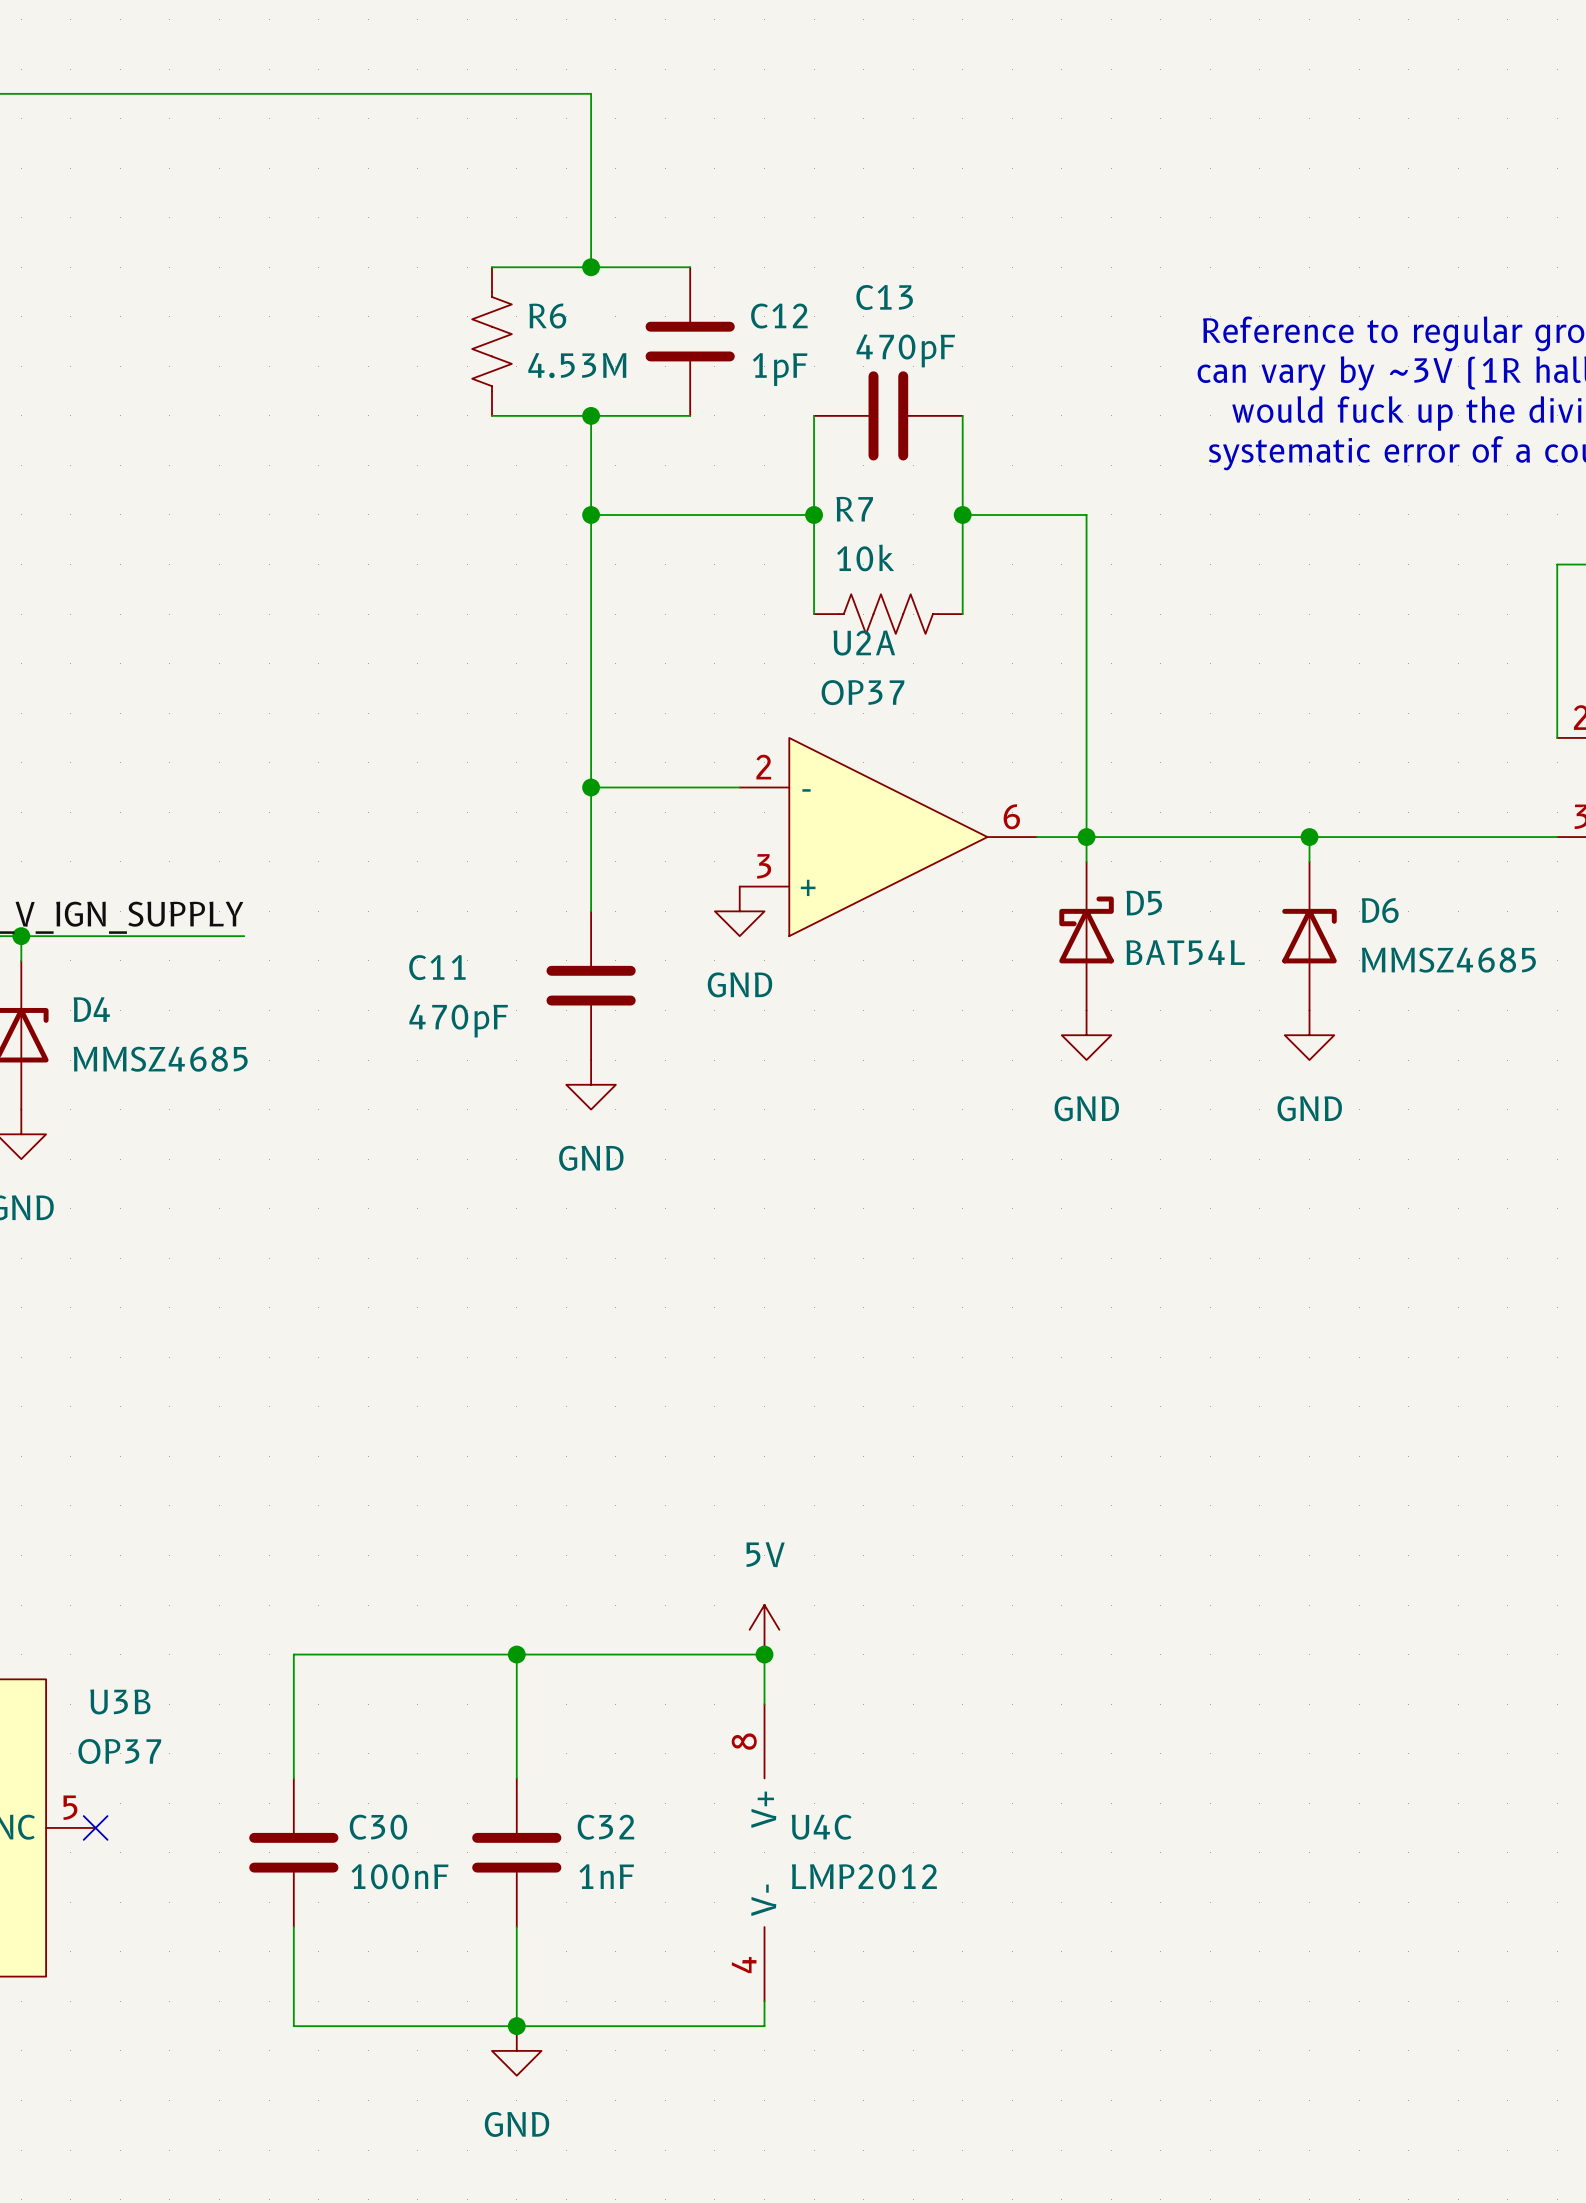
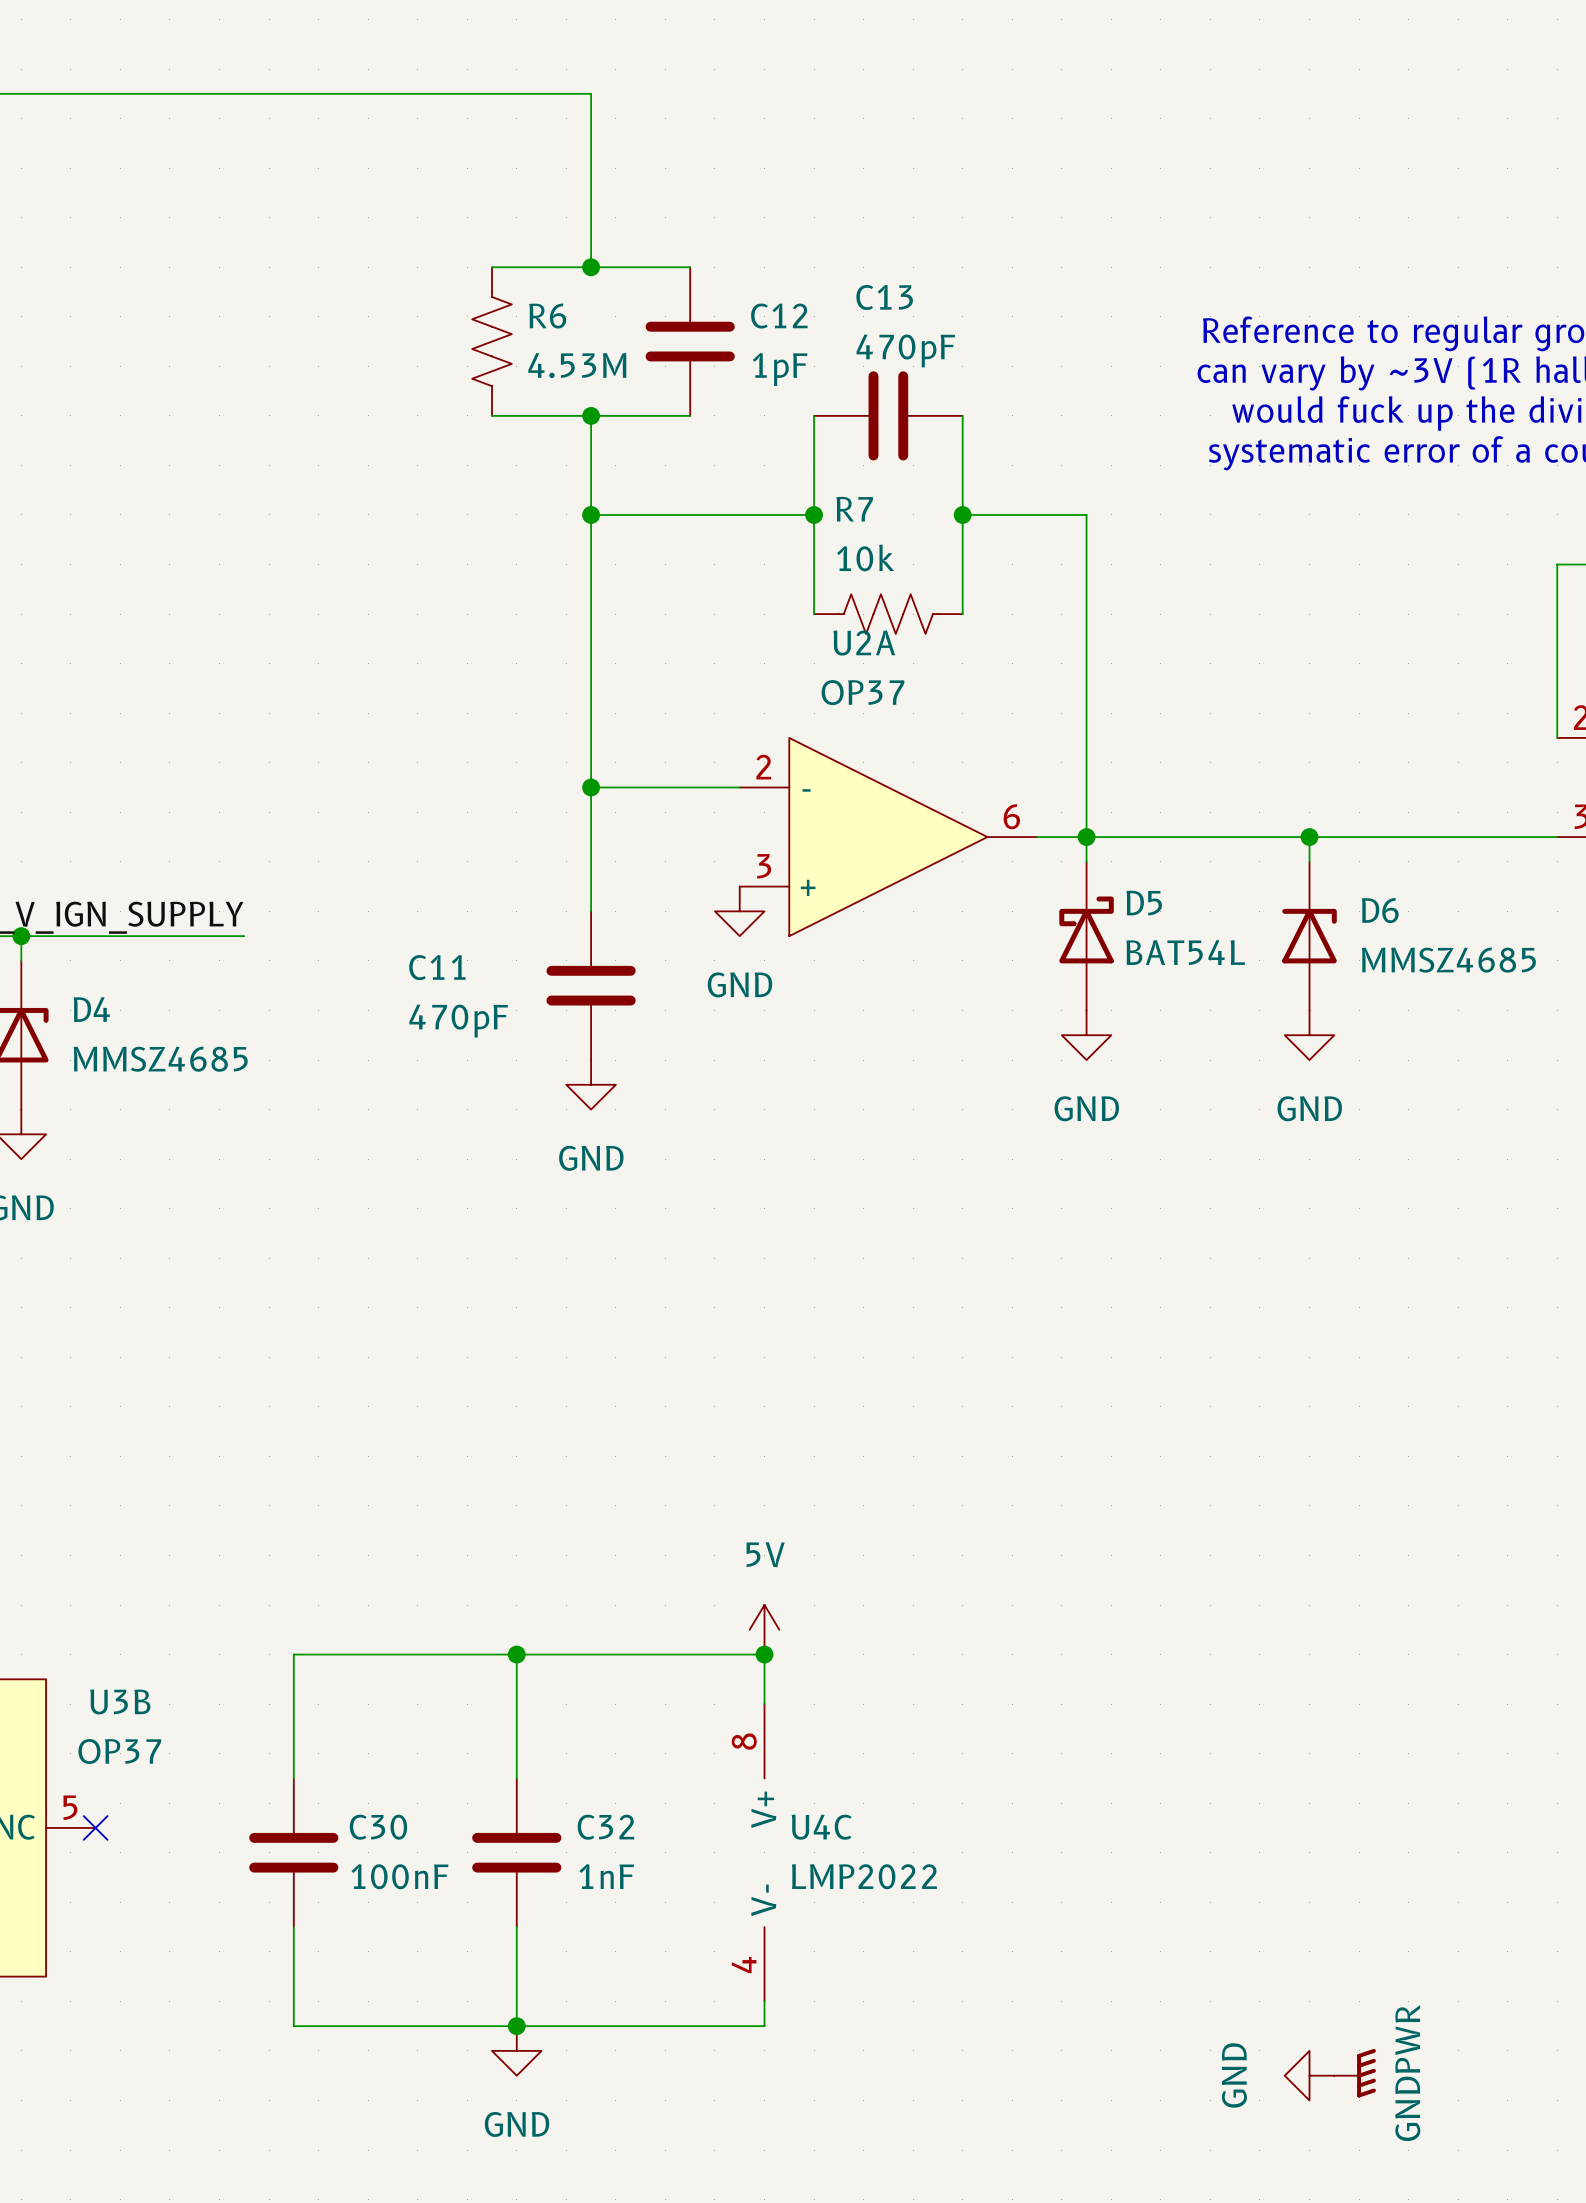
U4C value: LMP2012 (864, 1876) -> LMP2022 (864, 1876)
power symbol: none -> GNDPWR (1355, 2073)
power symbol: none -> GND (1309, 2075)

